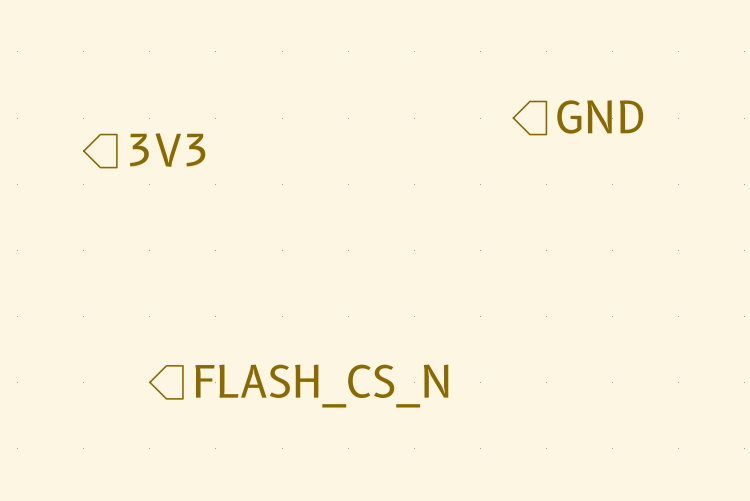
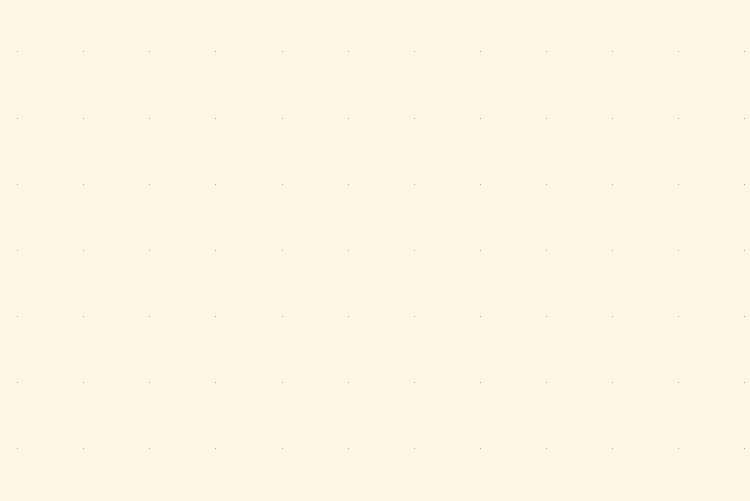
hierarchical label: GND (600, 116) -> none
hierarchical label: 3V3 (167, 150) -> none
hierarchical label: FLASH_CS_N (321, 386) -> none

